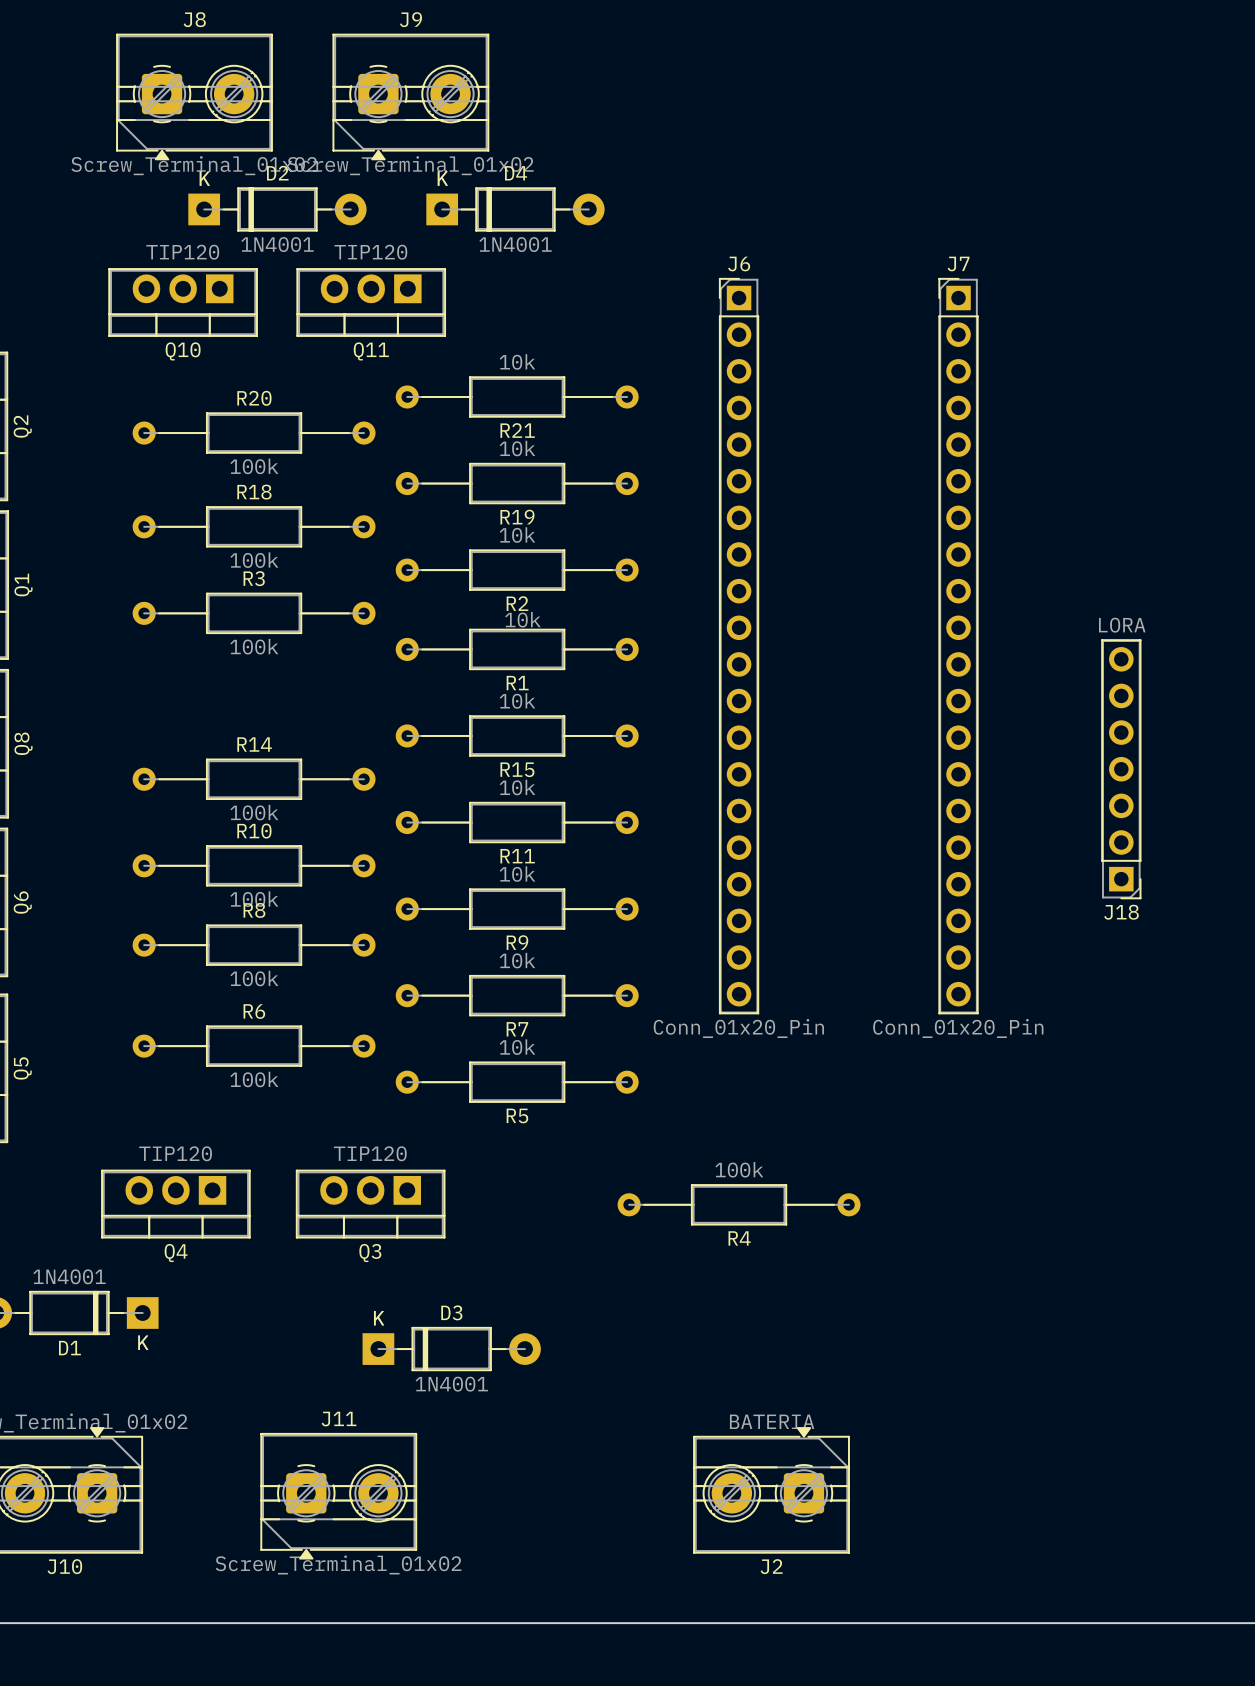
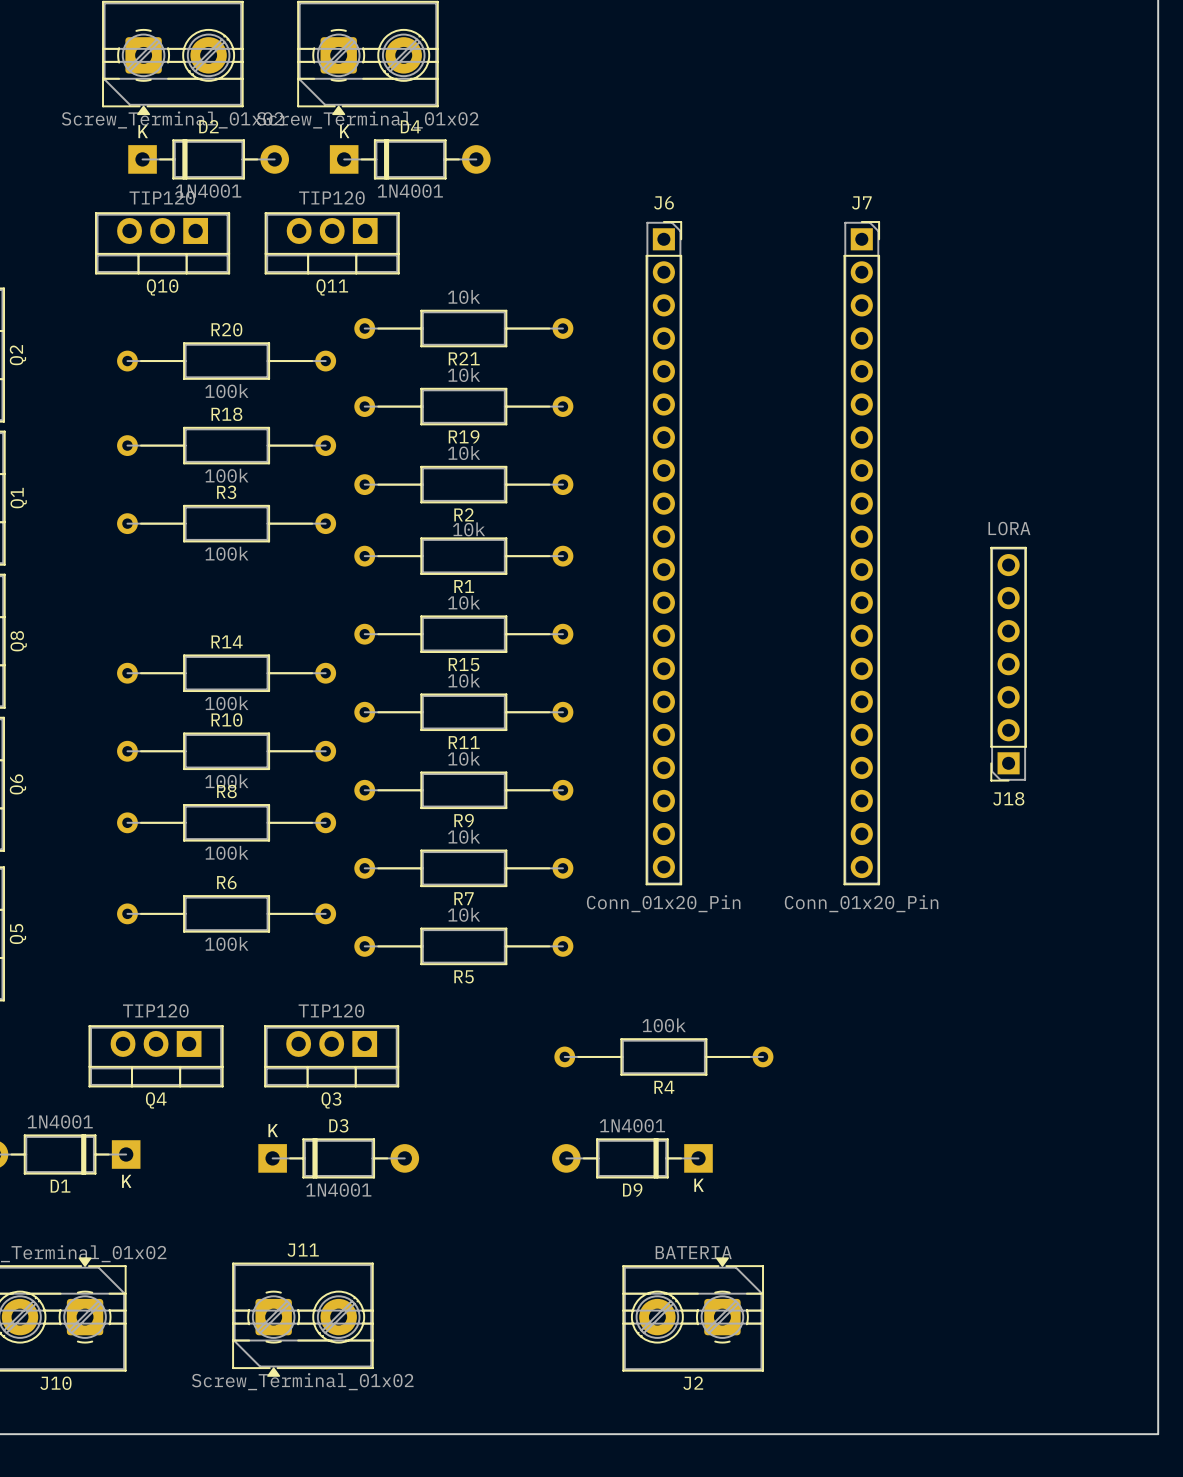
D2 position: (277, 209) -> (208, 159)
D4 position: (515, 209) -> (410, 159)
J6 footprint: [719, 277, 760, 1015] -> [645, 221, 682, 886]
J7 footprint: [938, 277, 979, 1015] -> [843, 221, 880, 886]
J18 footprint: [1101, 639, 1142, 900] -> [990, 546, 1027, 782]
D9: none -> 1N4001 (632, 1158)
D3 position: (451, 1349) -> (338, 1158)

